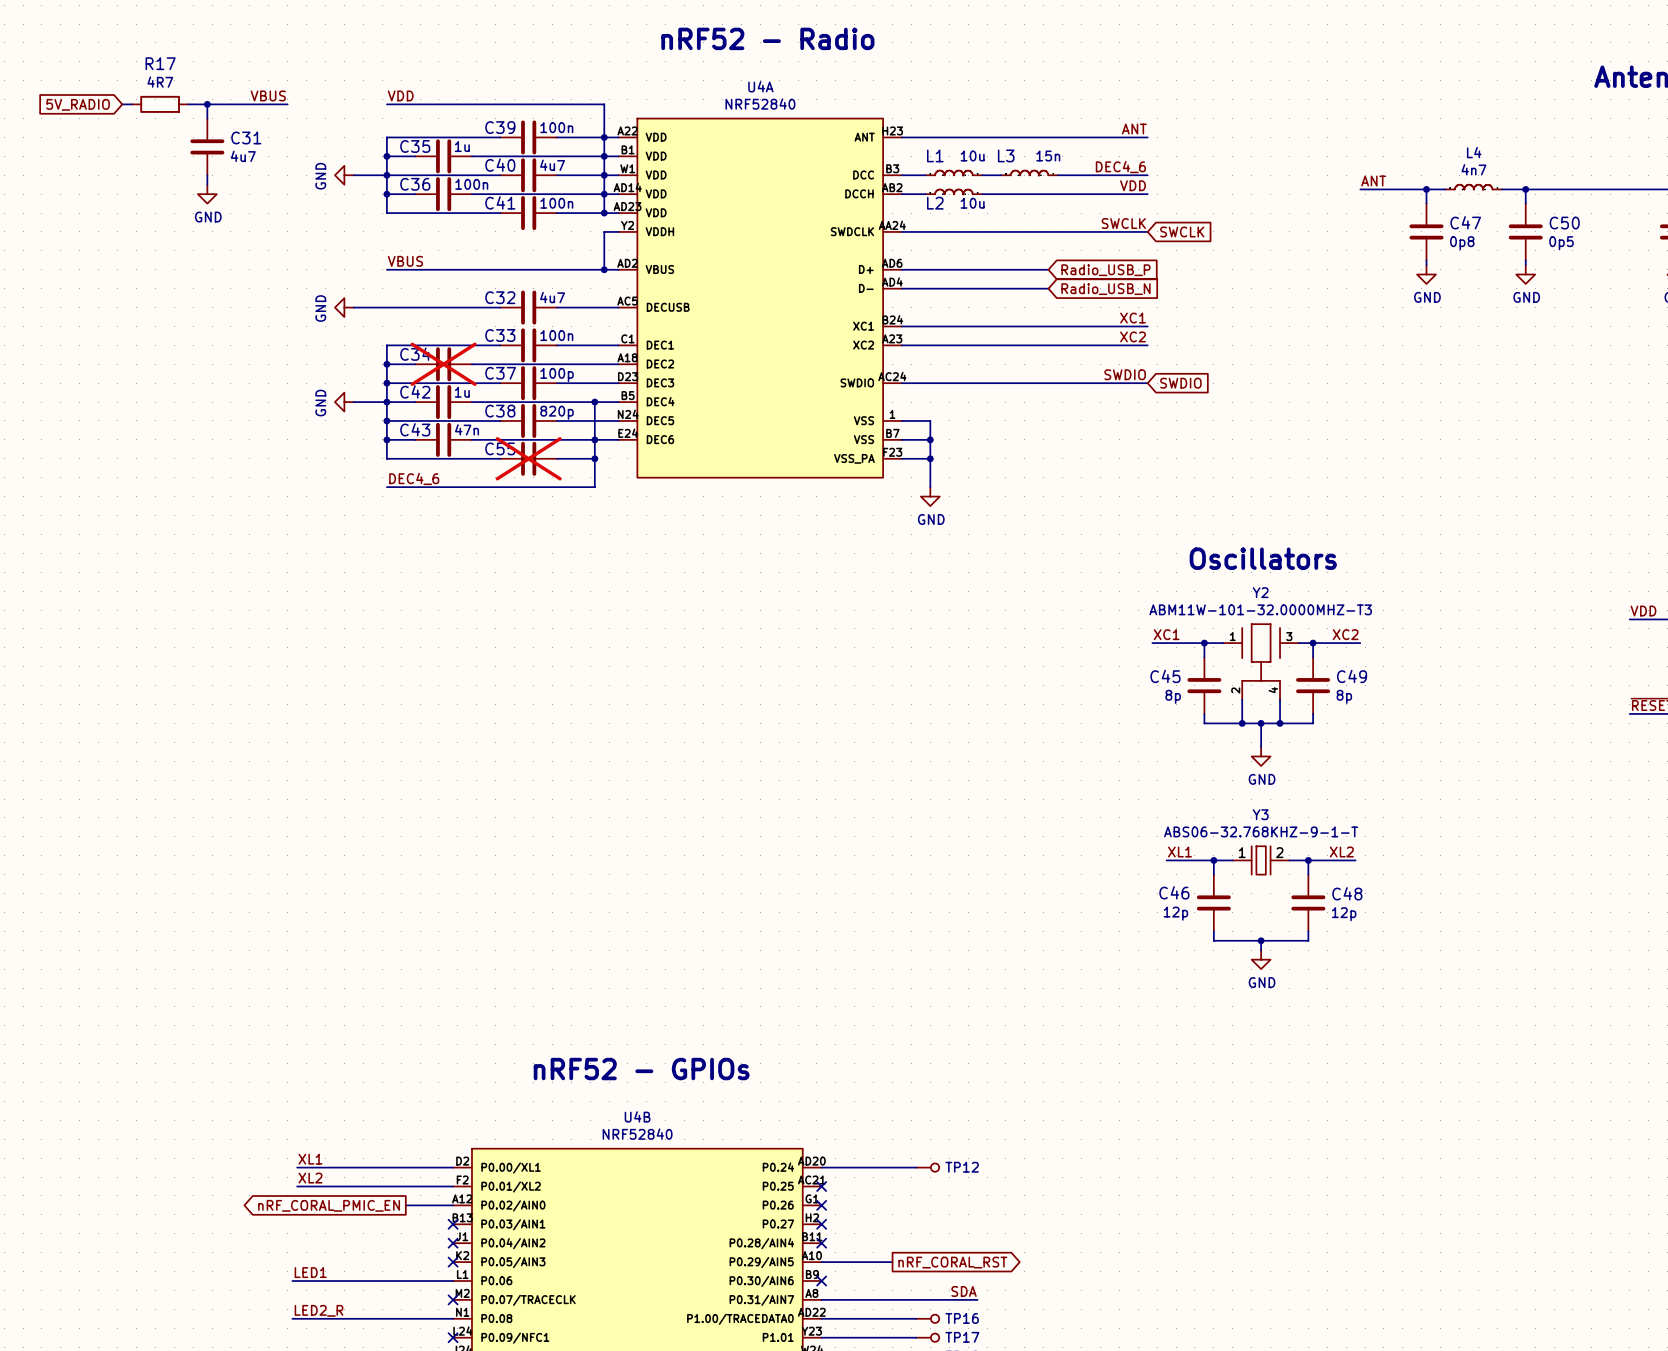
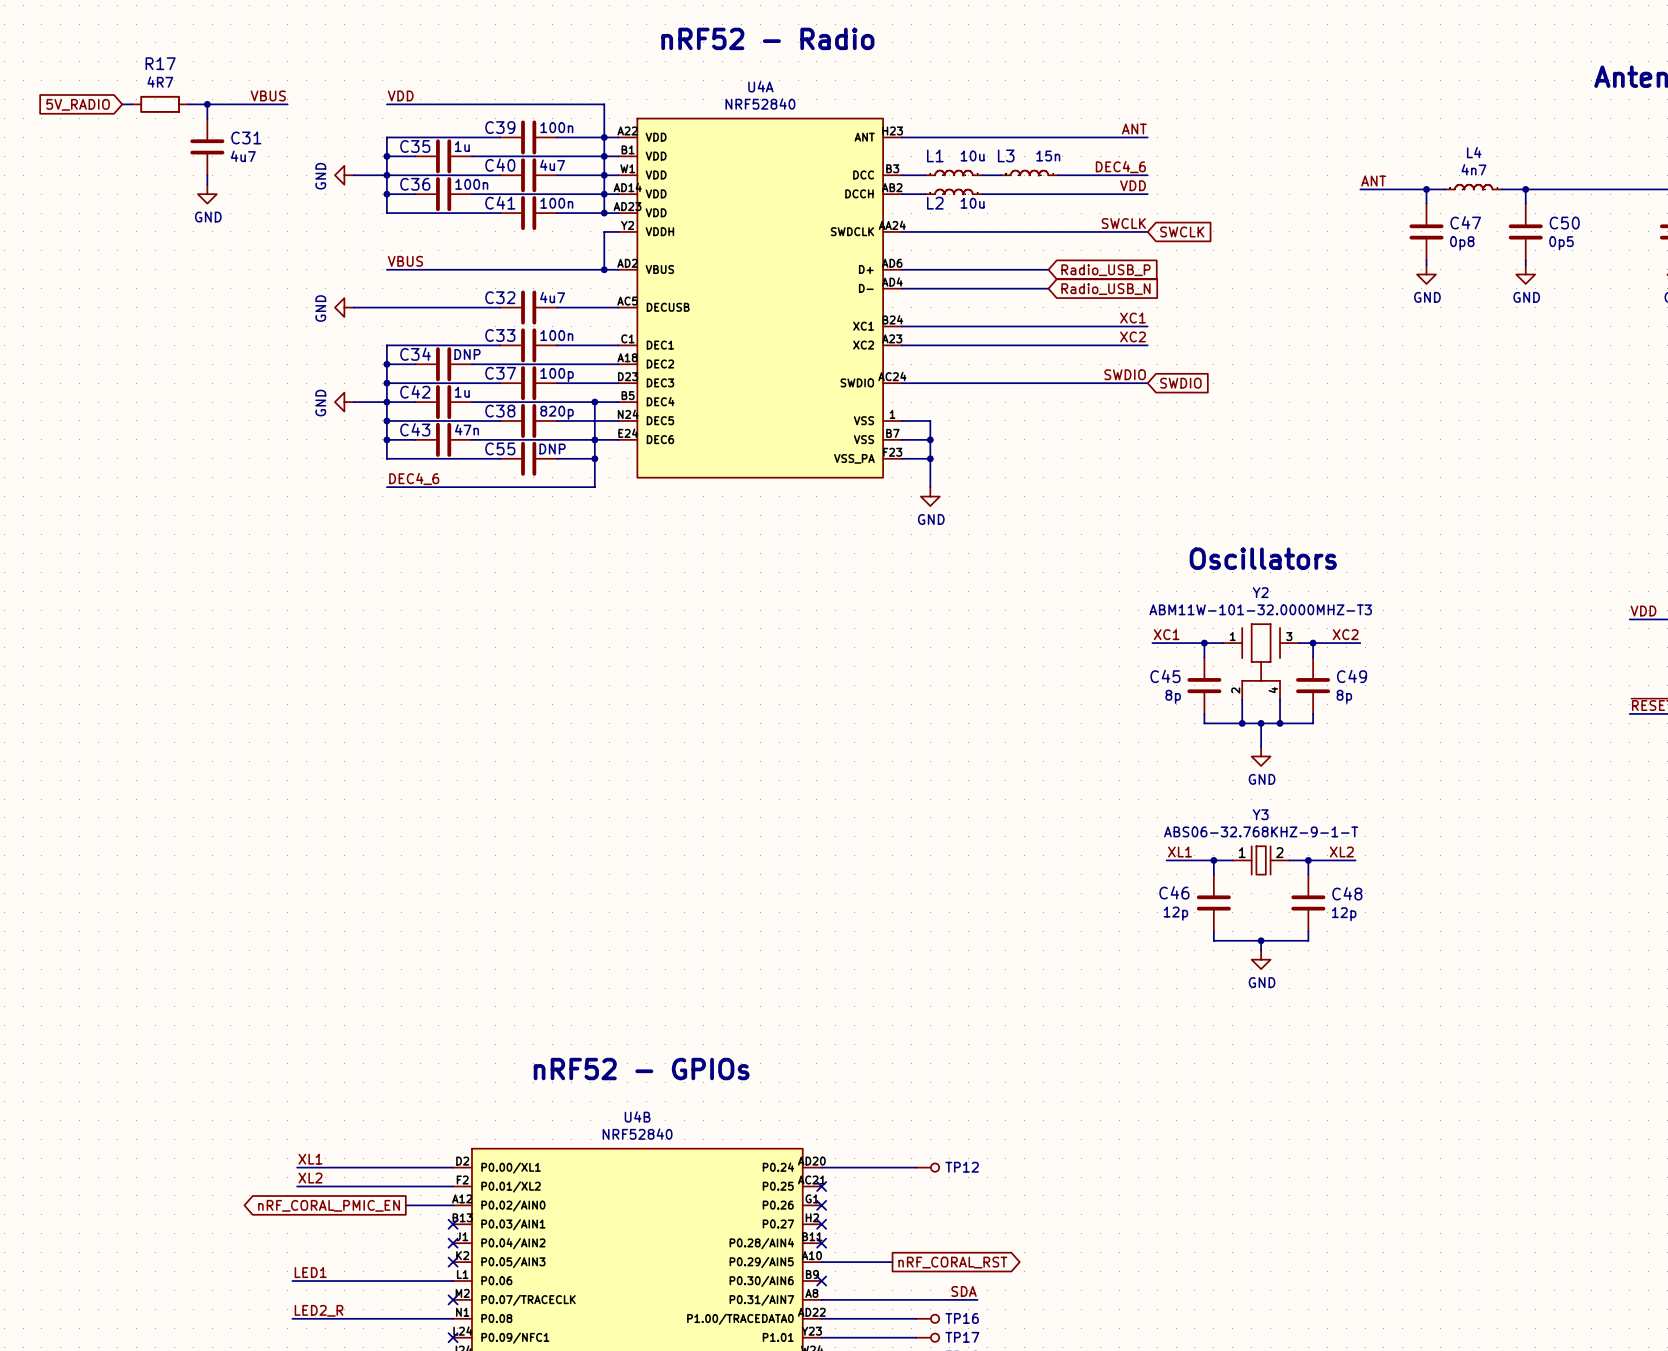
C34 text: none -> DNP (467, 354)
C34 do-not-place cross: (443, 364) -> none
C55 text: none -> DNP (552, 448)
C55 do-not-place cross: (528, 458) -> none

